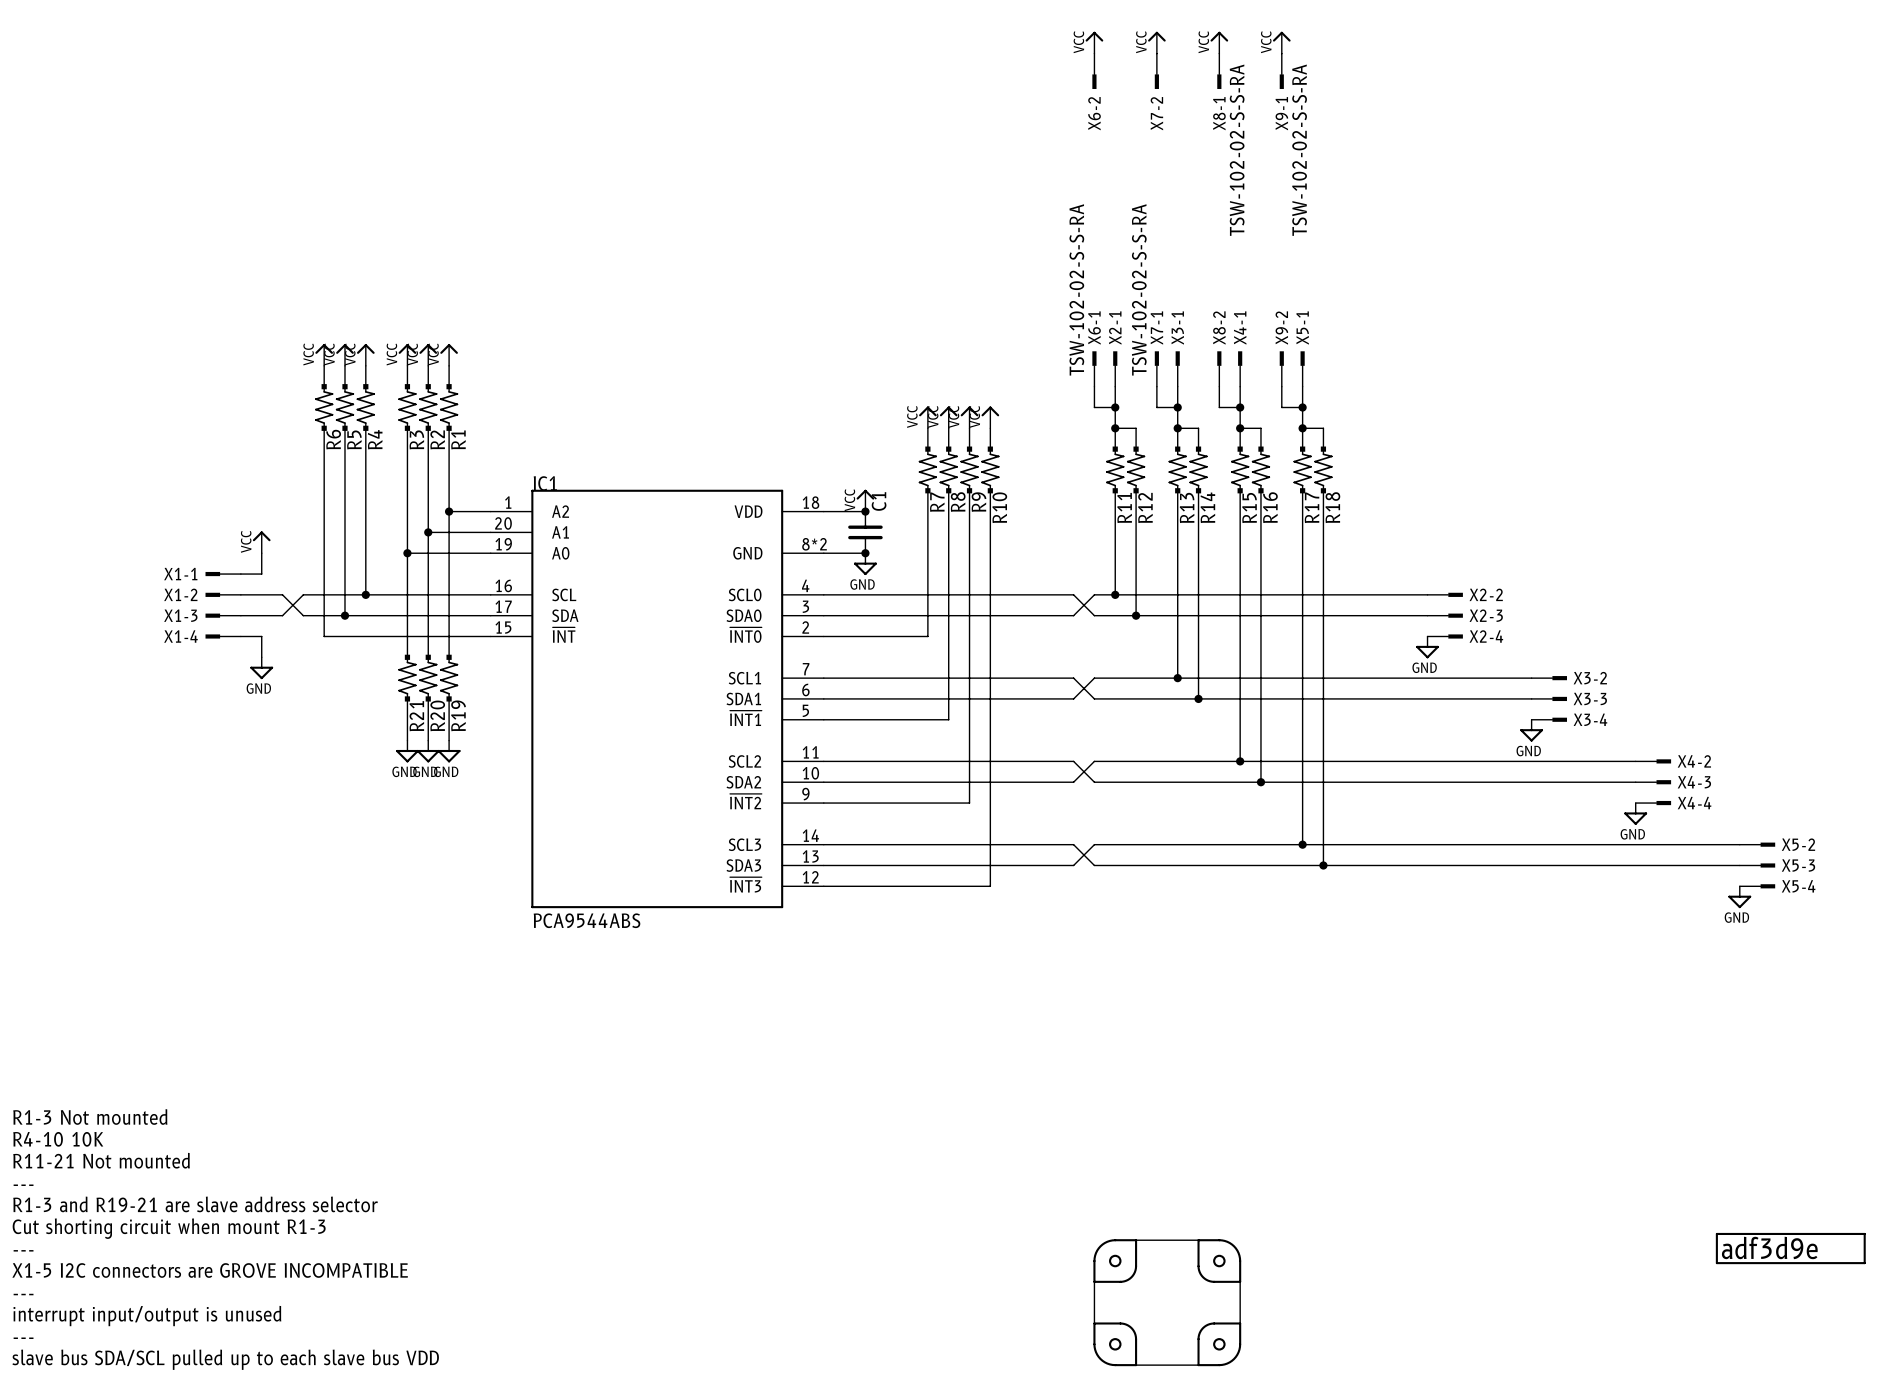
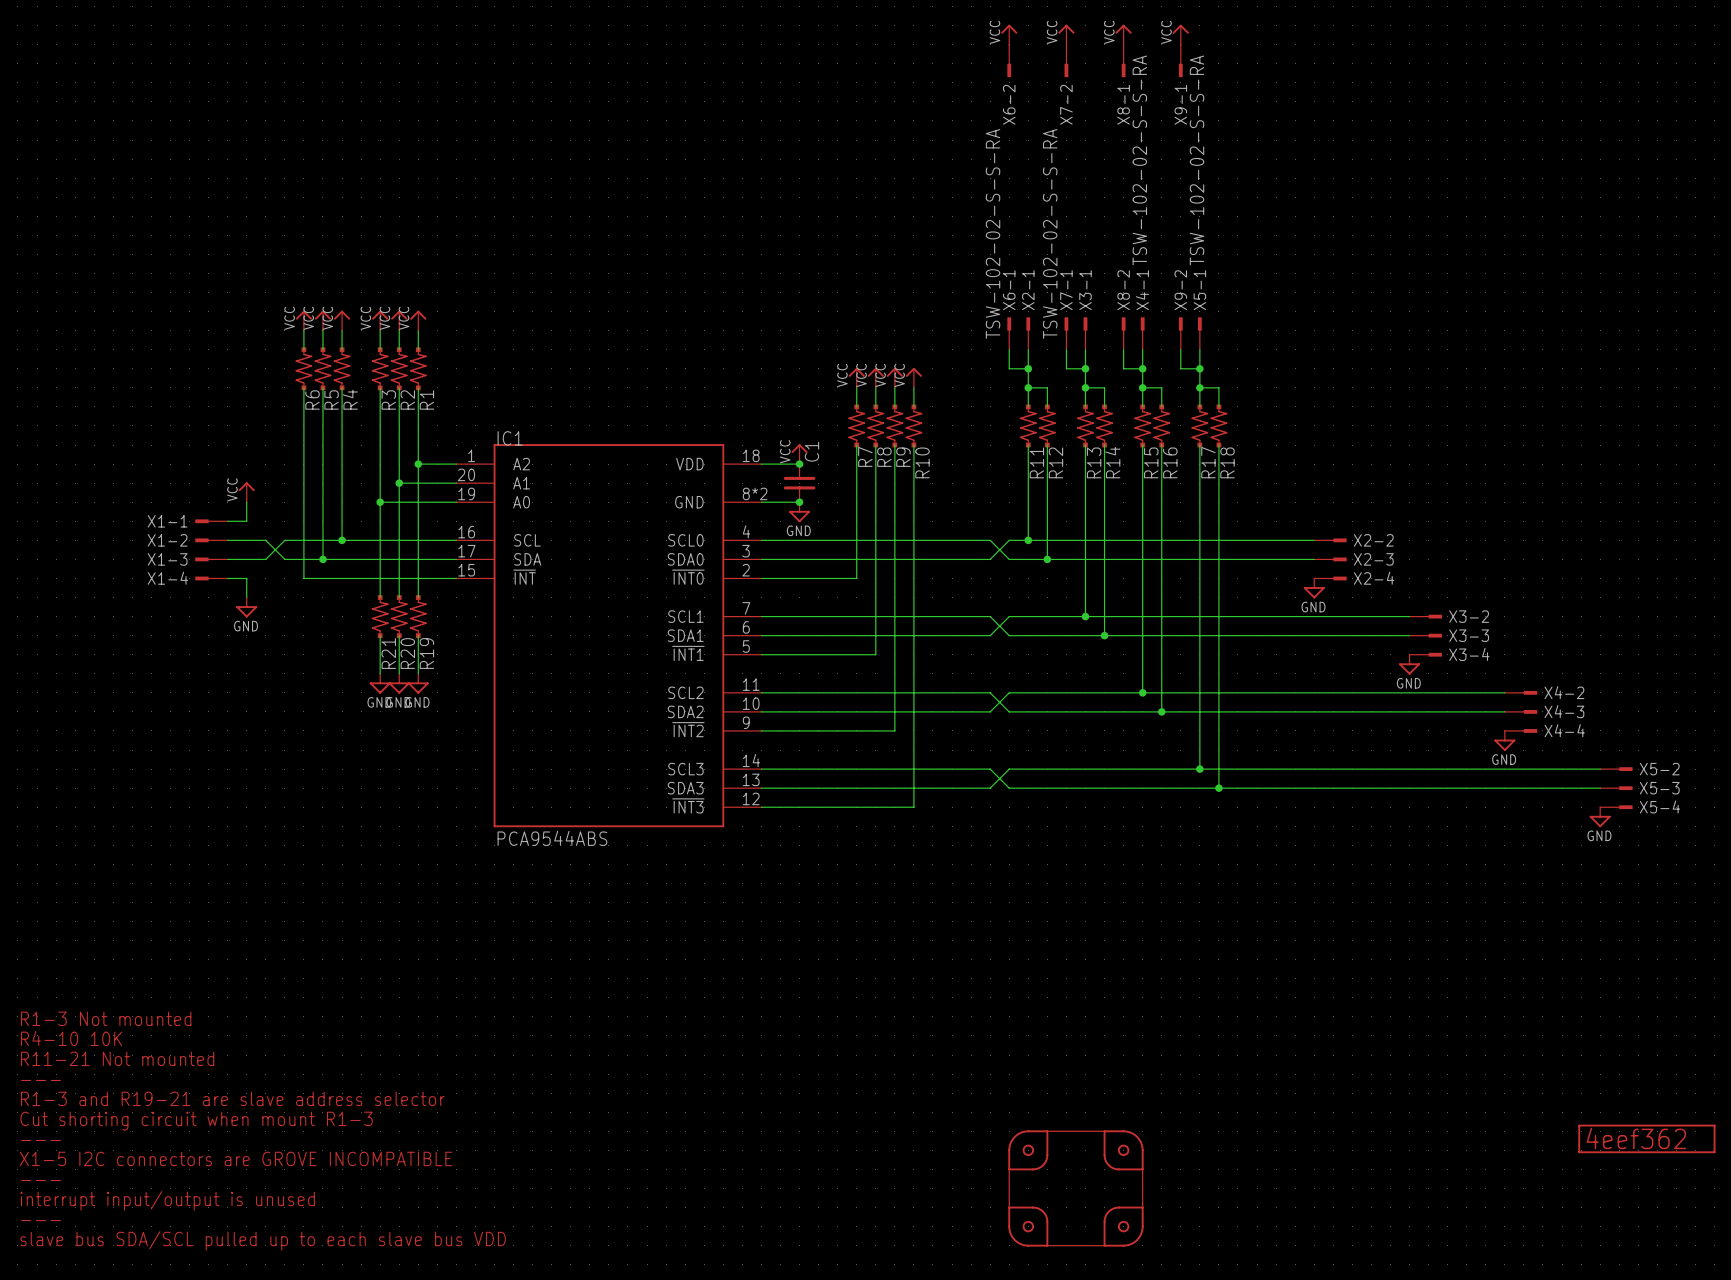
part value: adf3d9e (1769, 1247) -> 4eef362 (1636, 1138)

